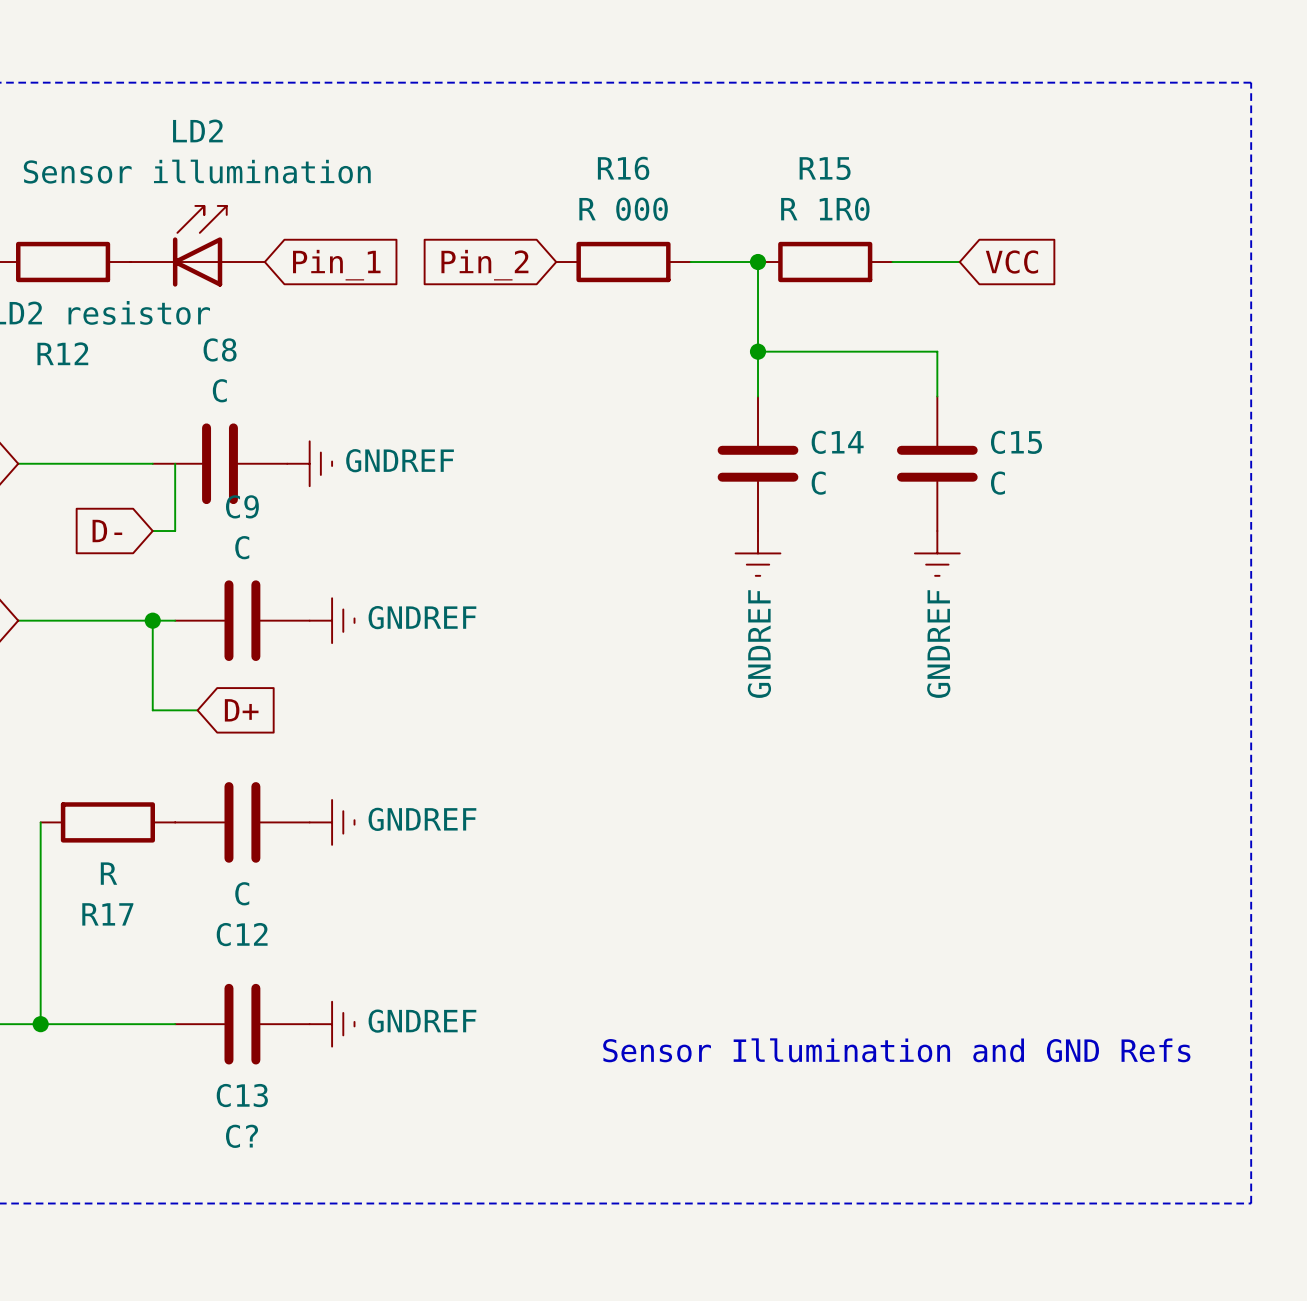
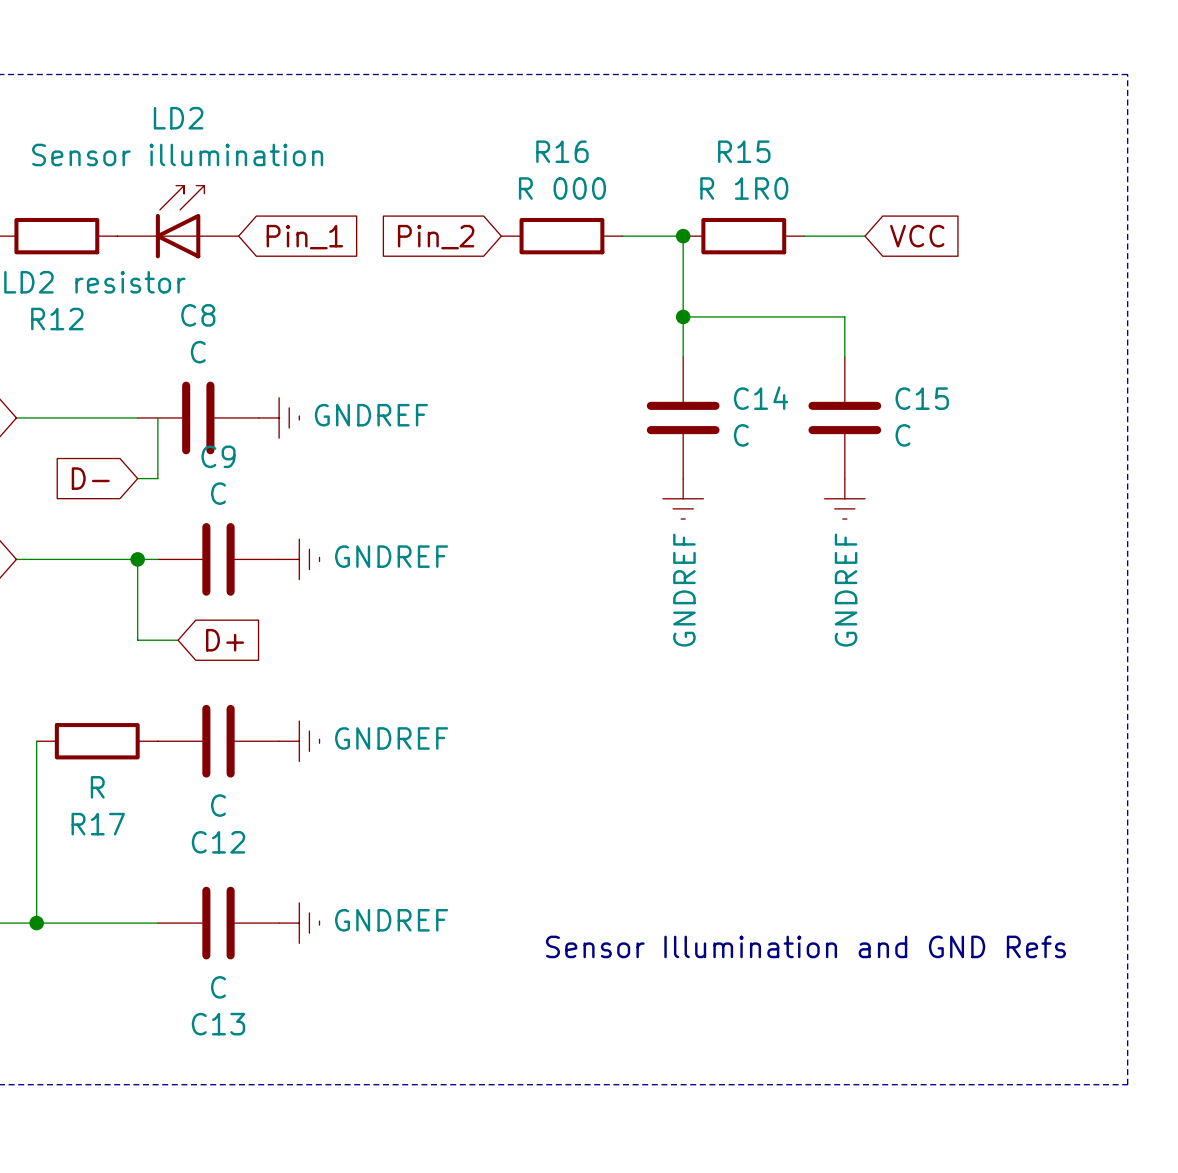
C? value: C13 (242, 1095) -> C (218, 987)
C? name: C? (242, 1136) -> C13 (218, 1024)

